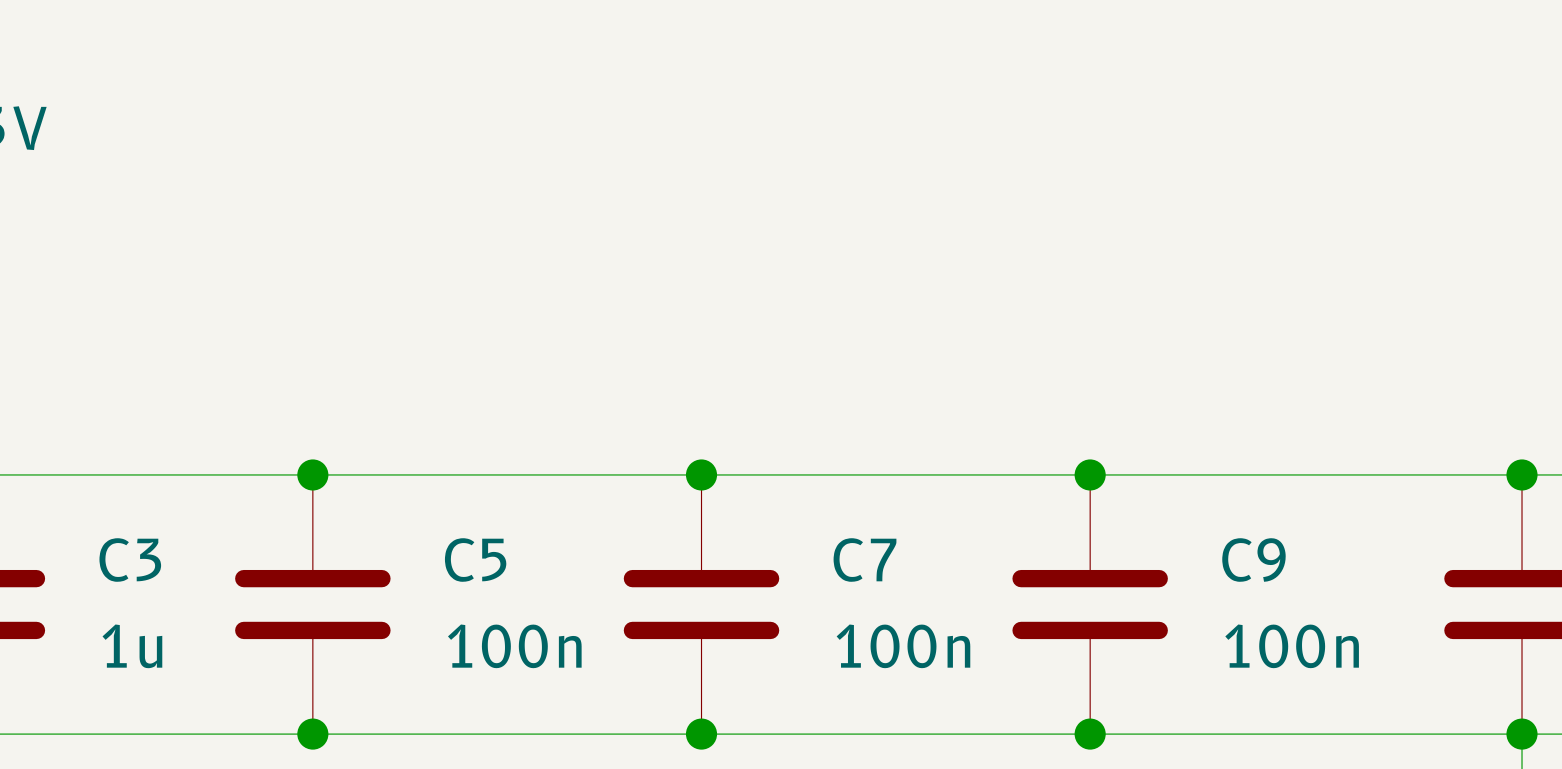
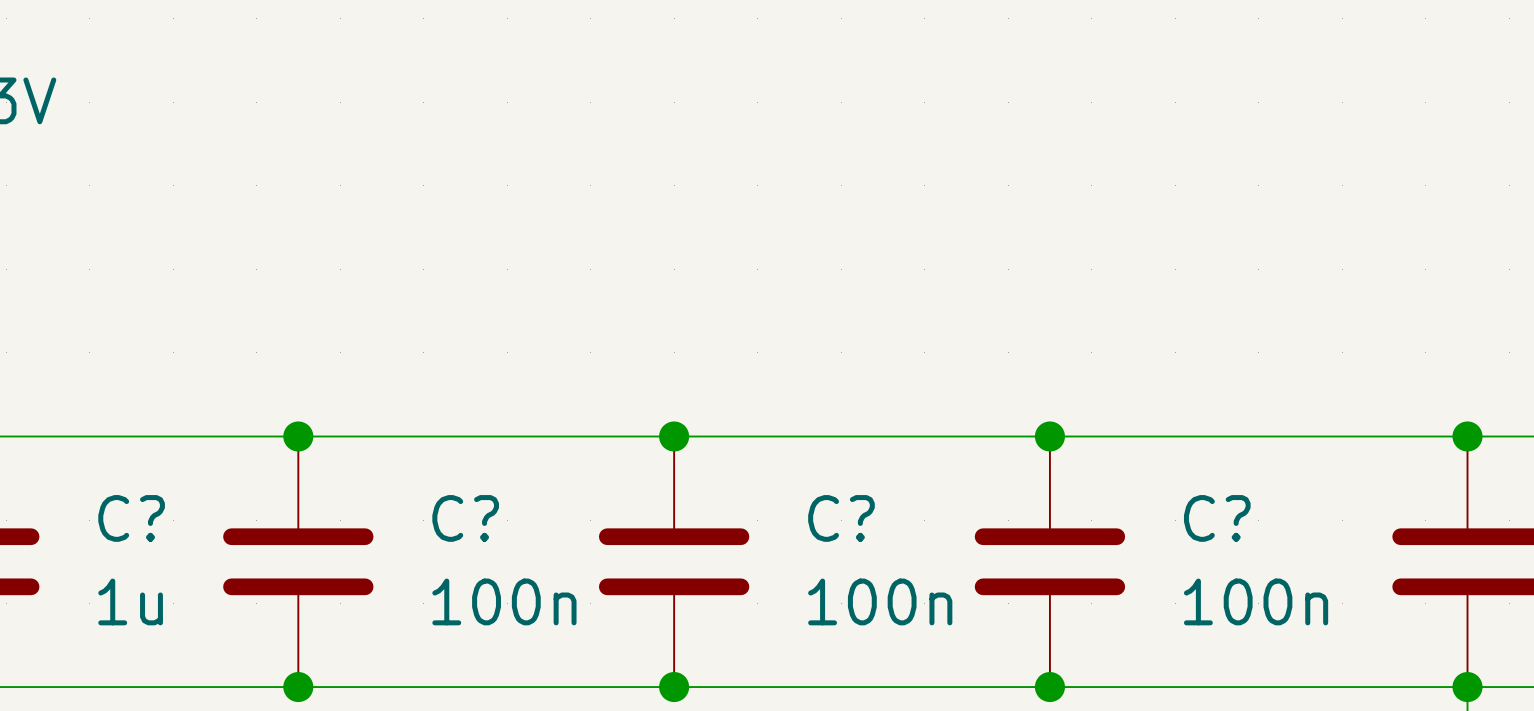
C3 name: C3 (130, 560) -> C? (131, 518)
C5 name: C5 (475, 560) -> C? (465, 518)
C7 name: C7 (865, 560) -> C? (841, 518)
C9 name: C9 (1253, 560) -> C? (1217, 518)

